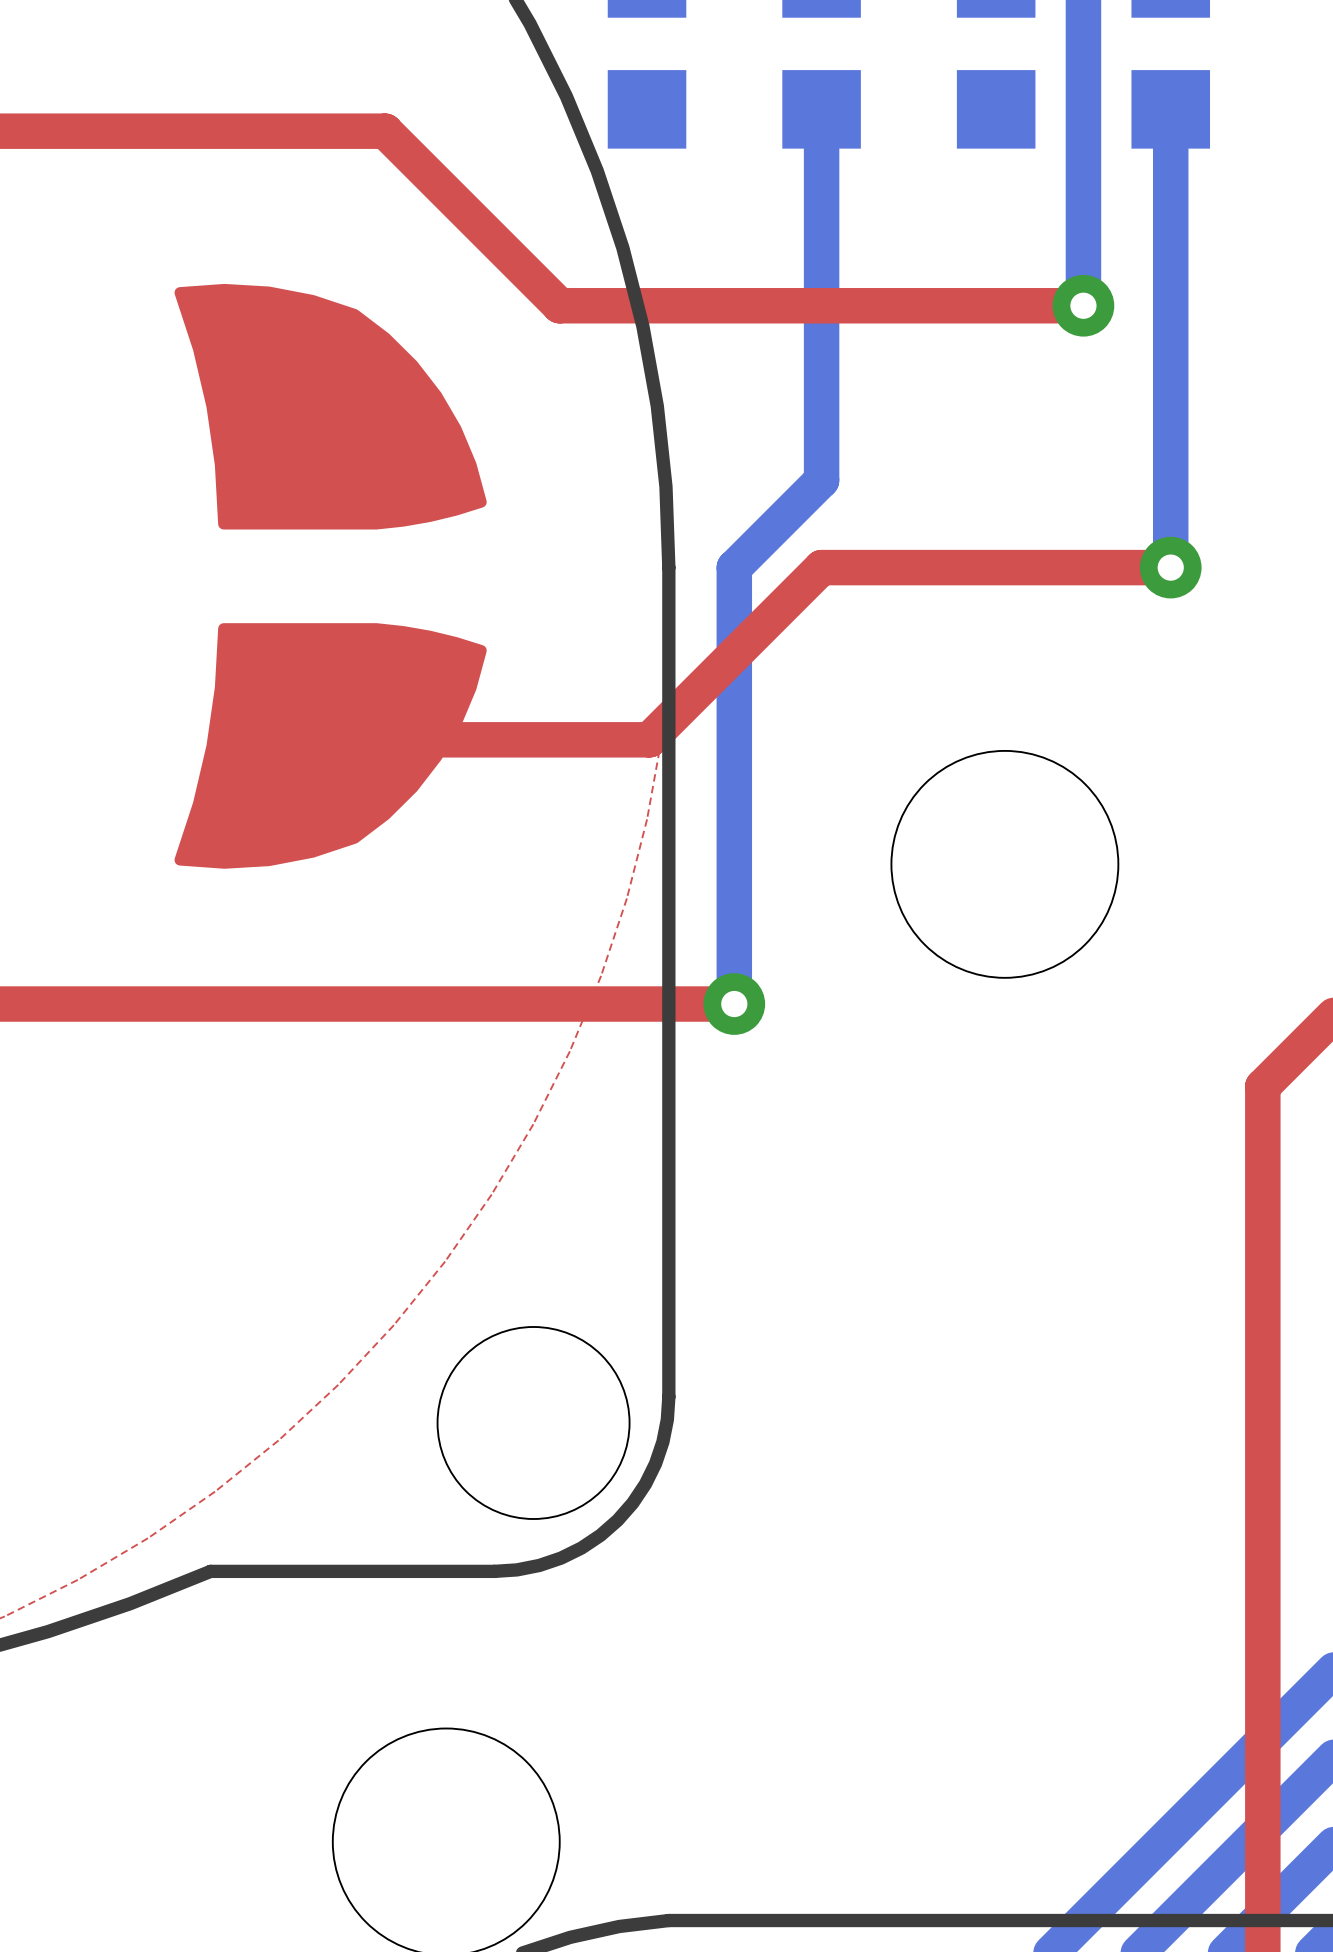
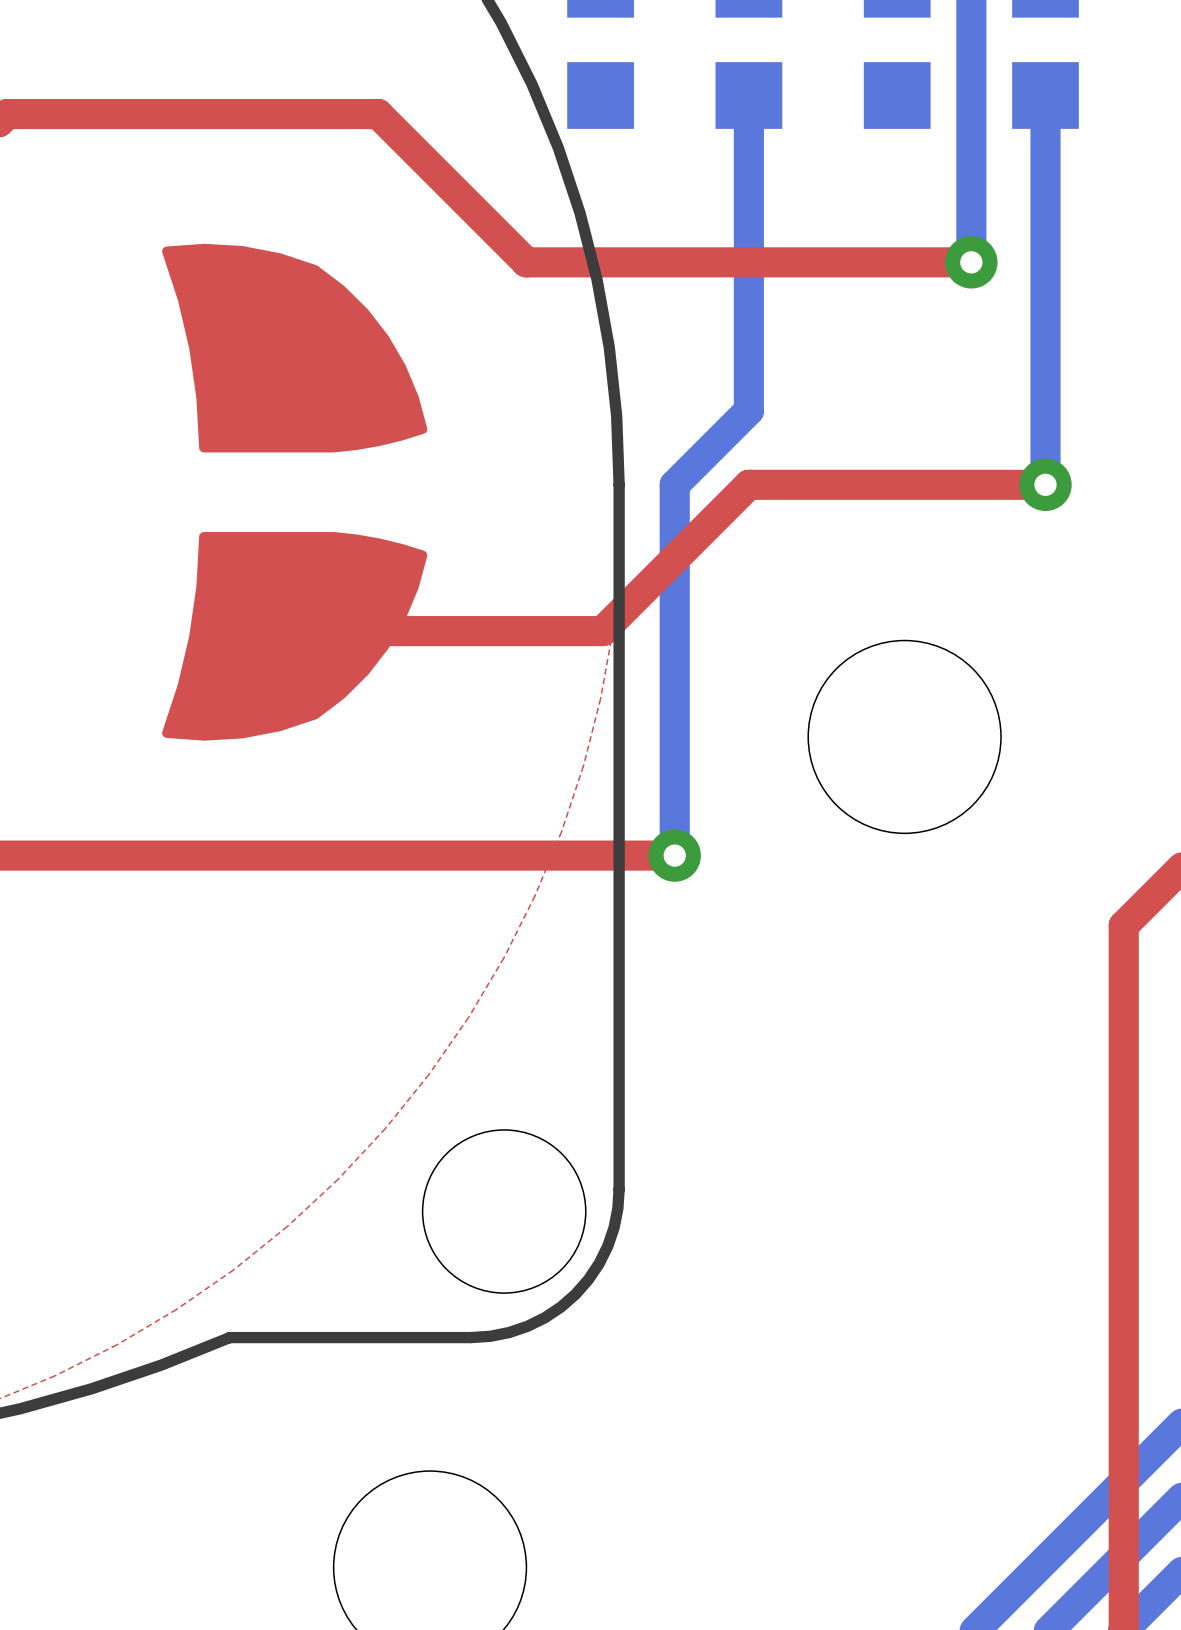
part position: (330, 576) -> (294, 492)

